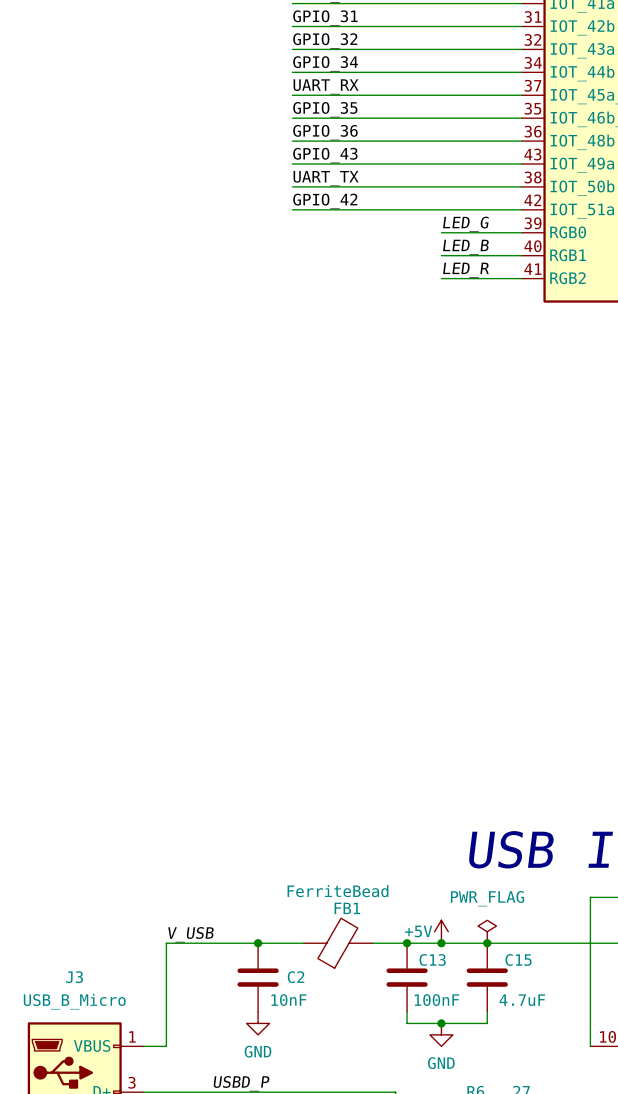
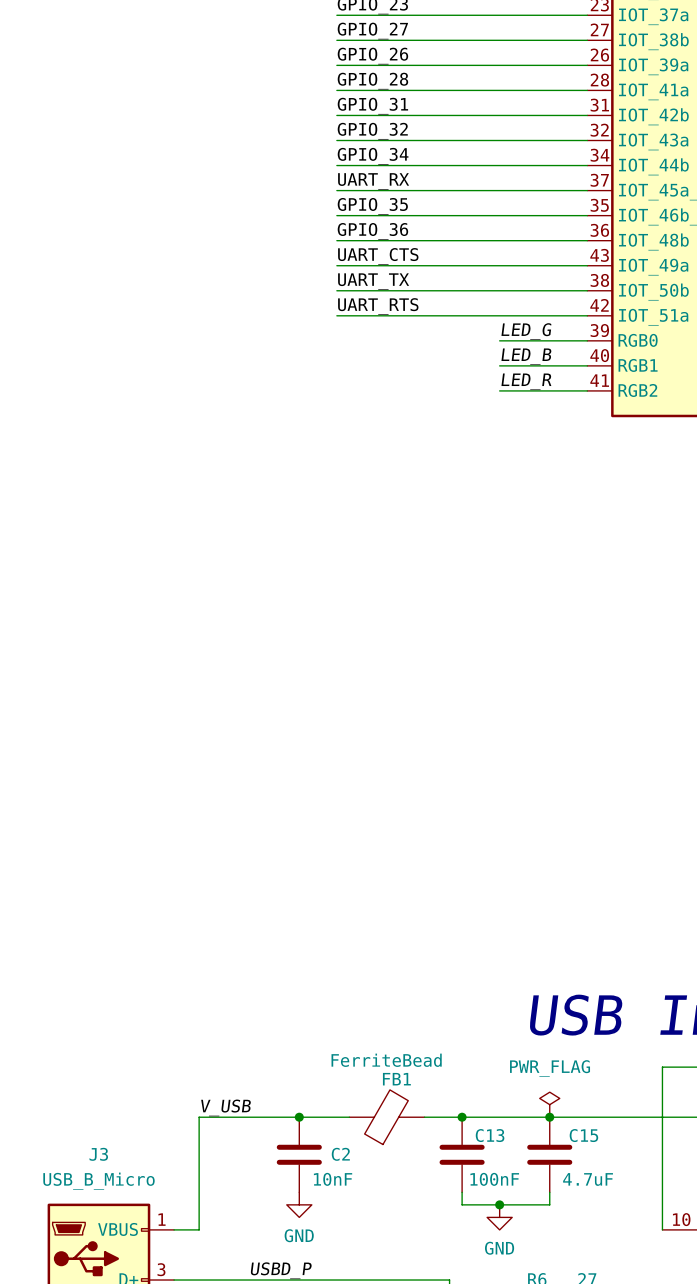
label: GPIO_43 (325, 155) -> UART_CTS (378, 256)
label: GPIO_42 (325, 201) -> UART_RTS (378, 306)
power symbol: +5V (441, 931) -> none
junction: (441, 943) -> none

